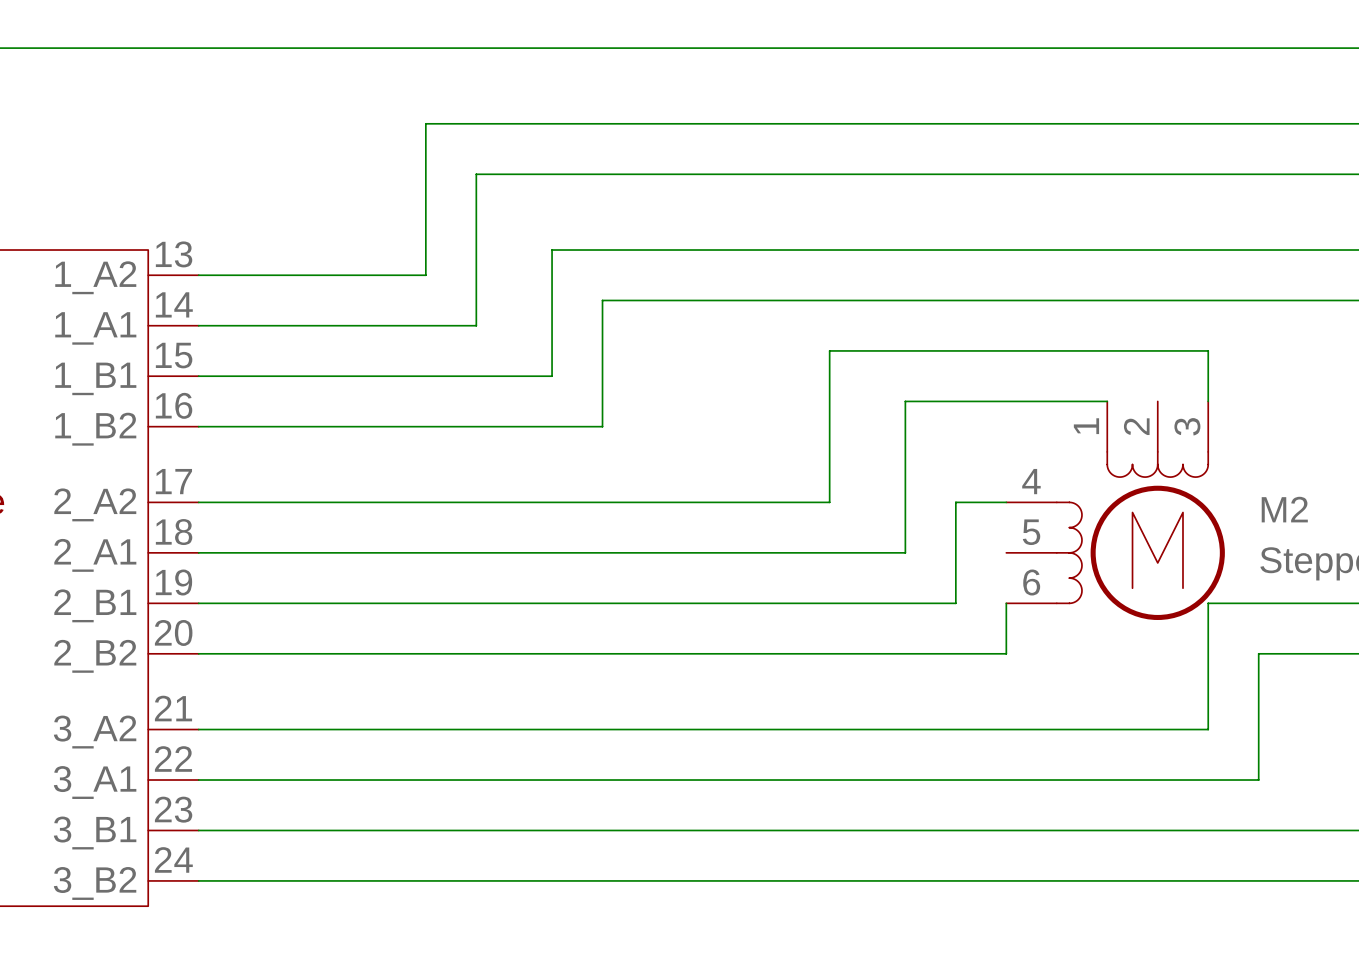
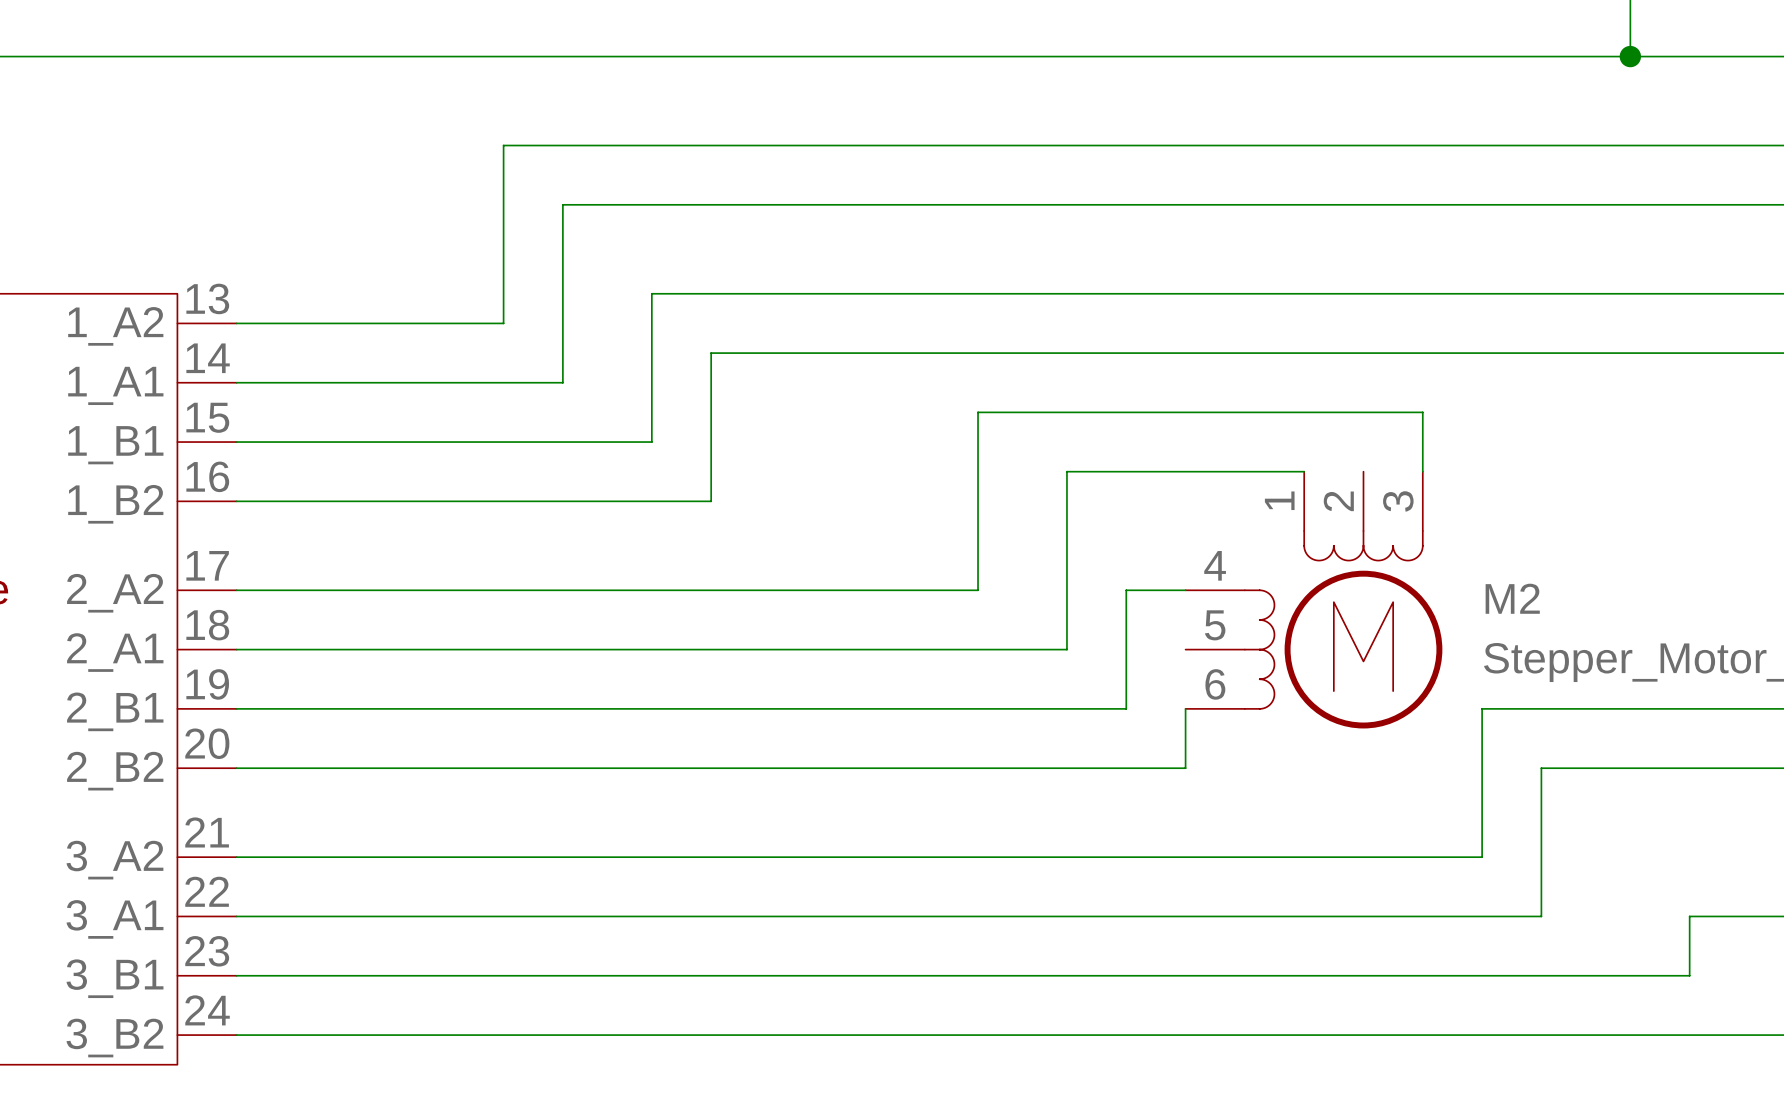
wire: (1258, 603) (1208, 603) (1208, 729) -> none
wire: (1258, 653) (1309, 653) -> (1482, 768) (1482, 708)
wire: none -> (1541, 768) (1541, 916) (1482, 916)
wire: (1258, 729) (1258, 780) -> (1482, 857) (1422, 857)

